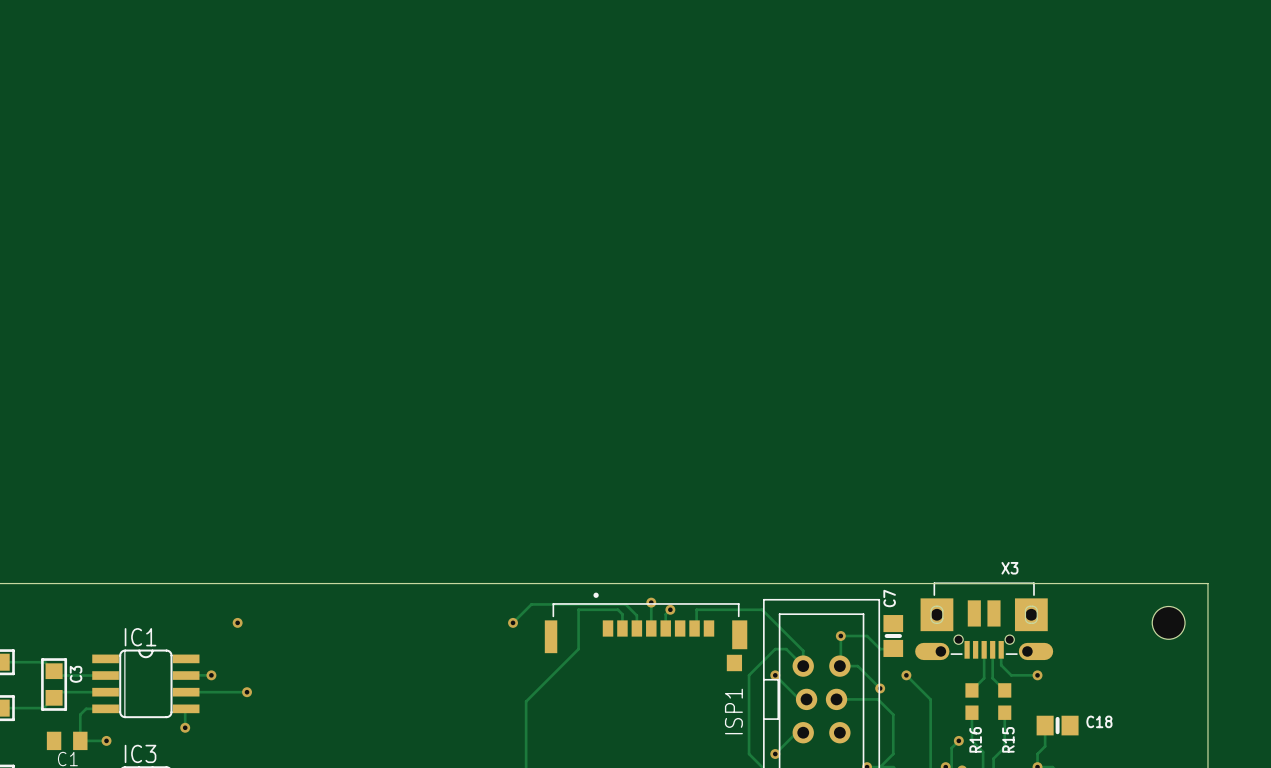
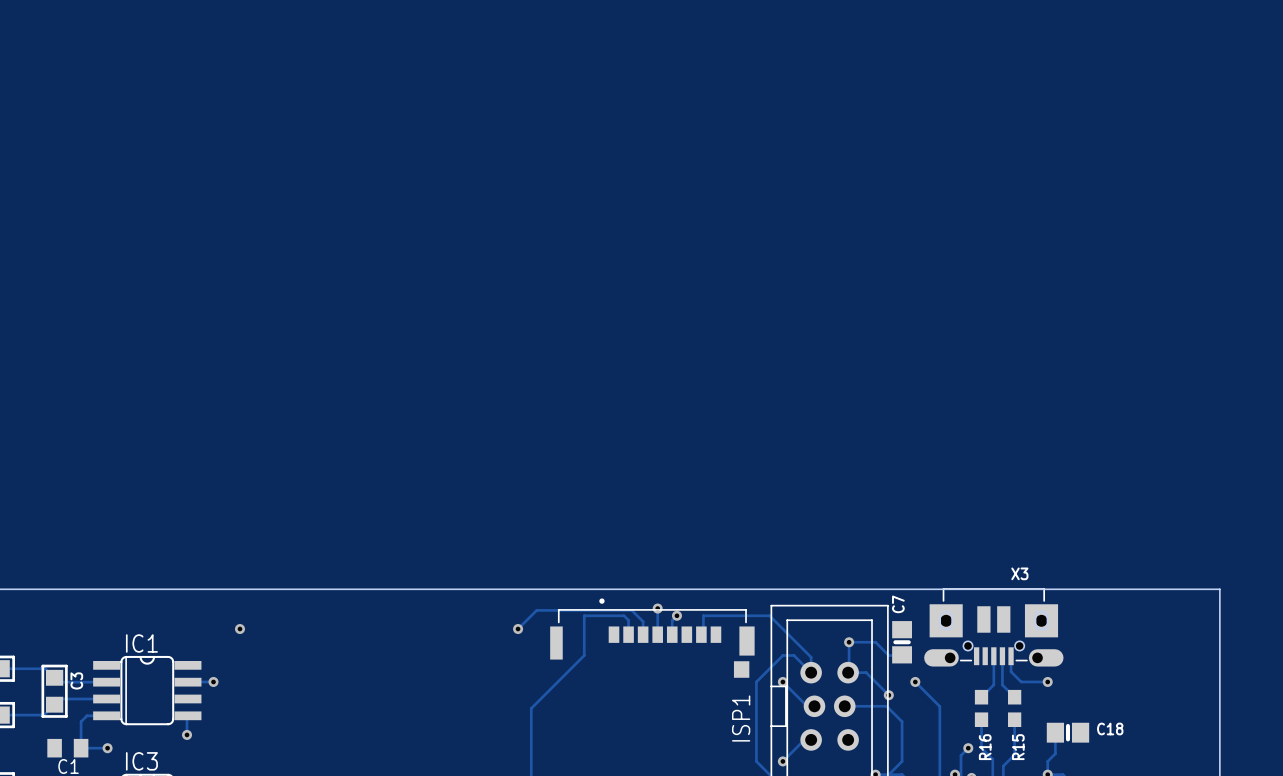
hole: (1168, 622) -> none
track: (186, 692) (247, 692) -> none
via: (247, 692) -> none

